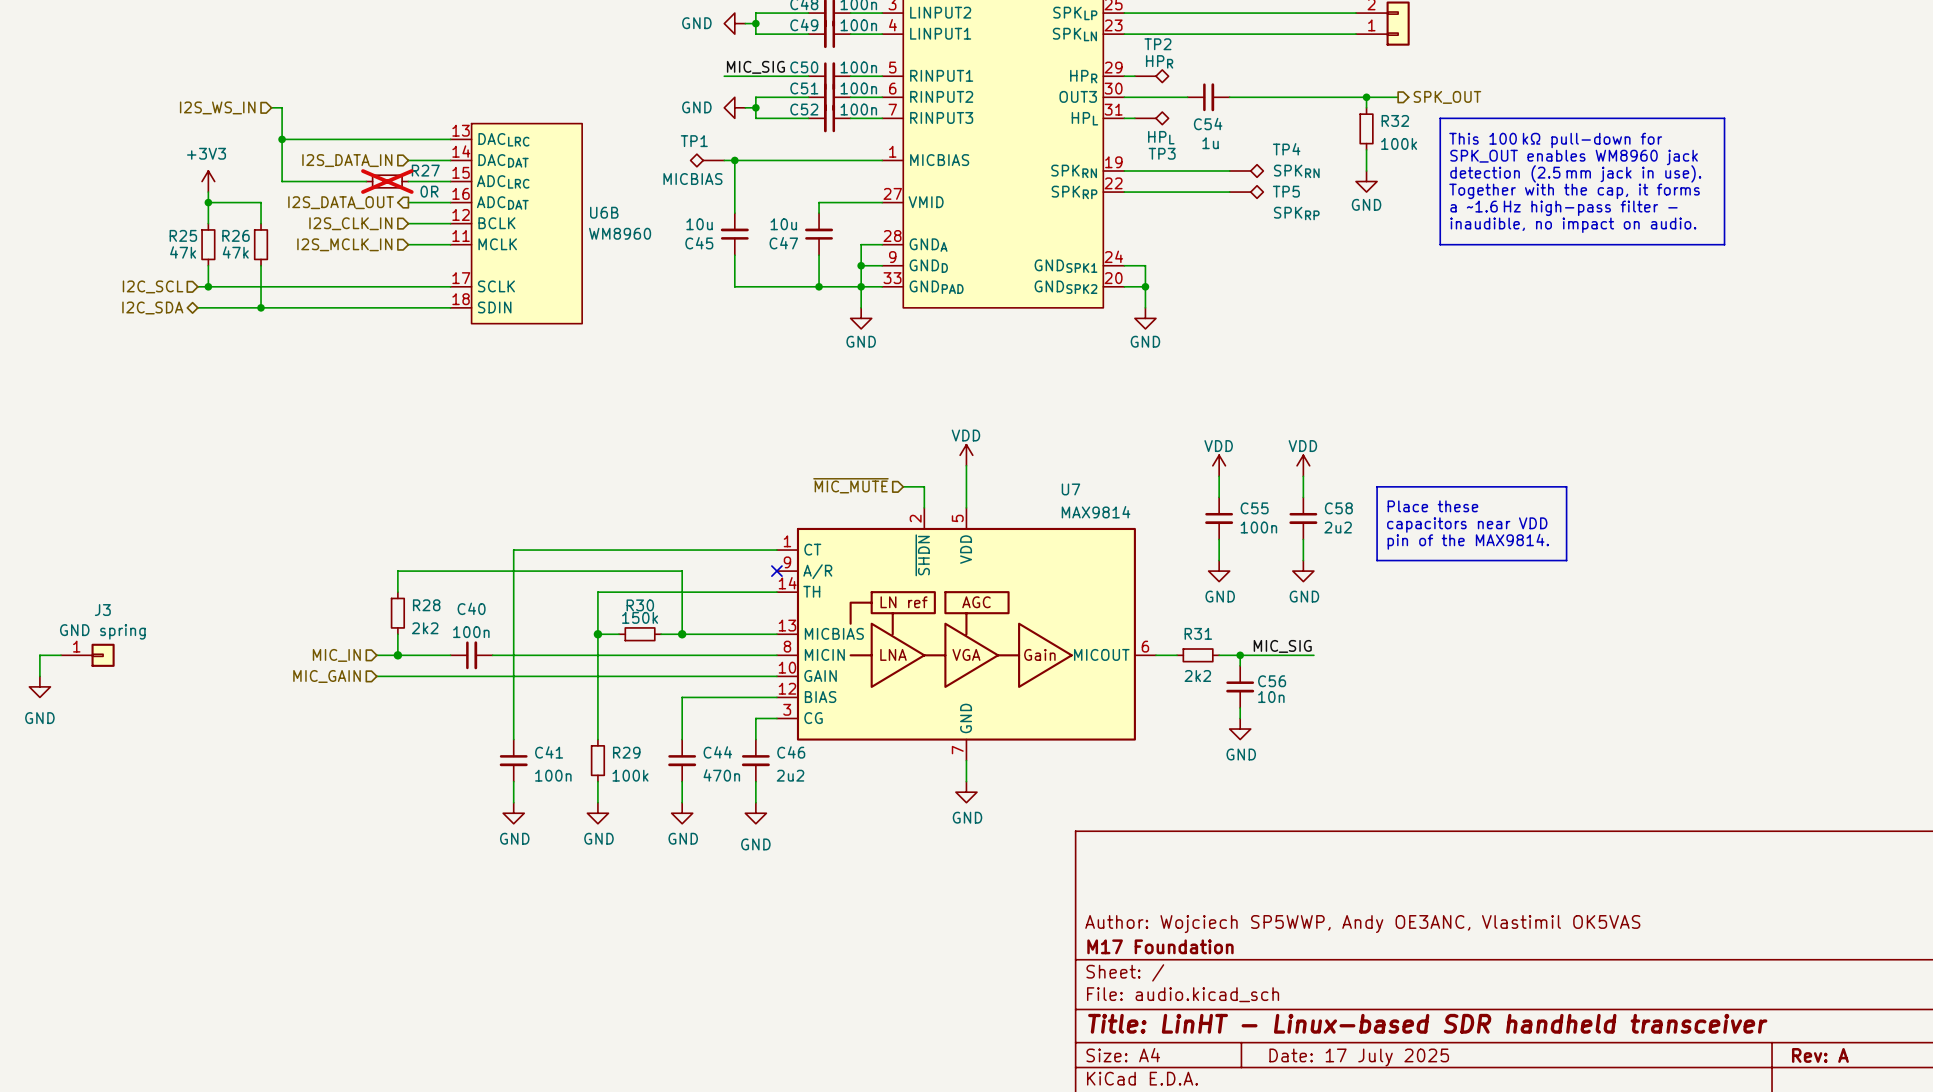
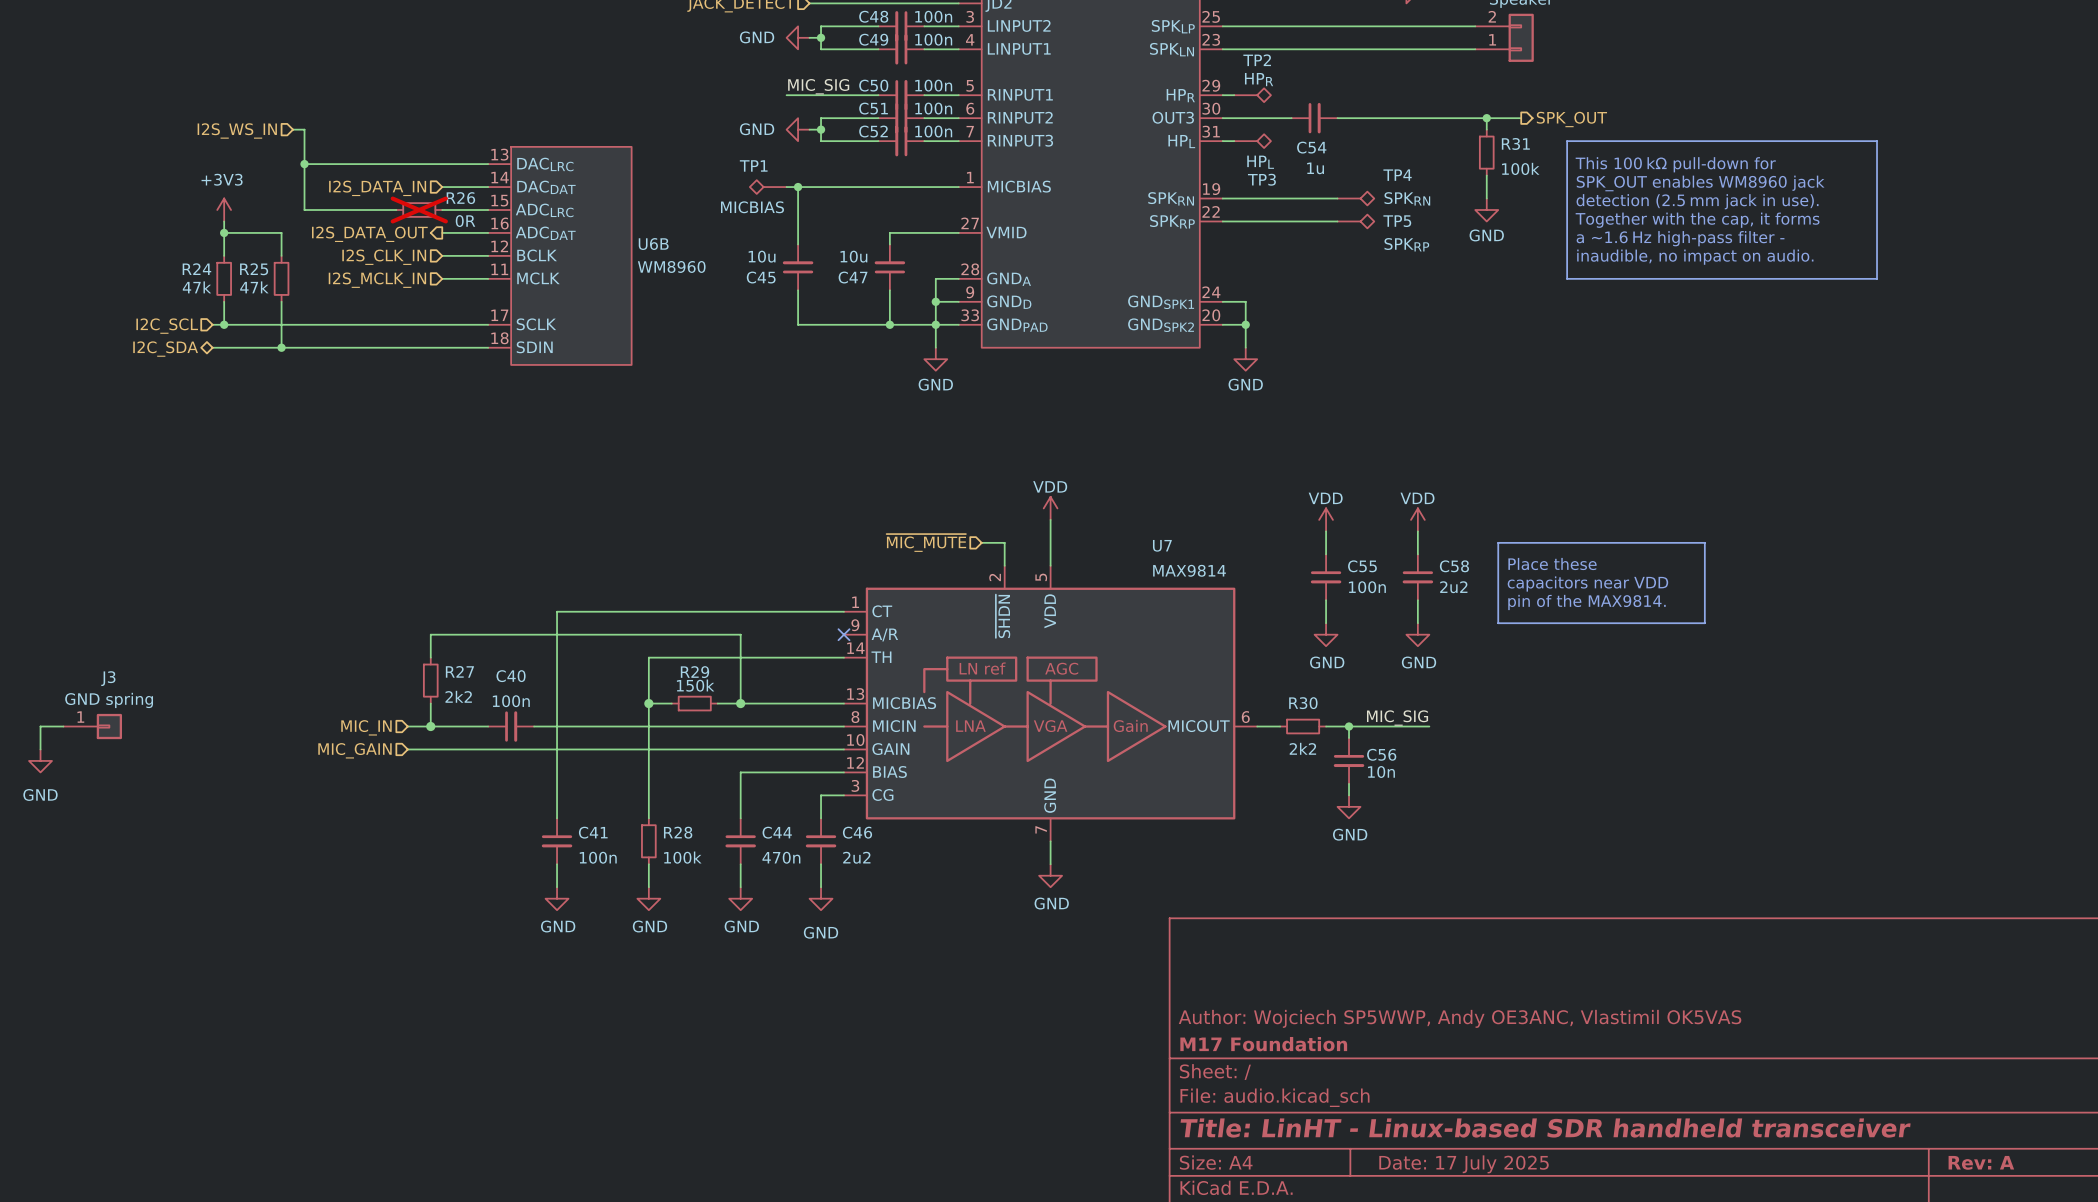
R32 name: R32 (1395, 120) -> R31 (1515, 143)
R27 name: R27 (425, 170) -> R26 (460, 198)
R25 name: R25 (183, 235) -> R24 (196, 269)
R26 name: R26 (236, 235) -> R25 (254, 269)
R28 name: R28 (426, 605) -> R27 (459, 671)
R30 name: R30 (640, 605) -> R29 (694, 672)
R31 name: R31 (1198, 633) -> R30 (1303, 703)
R29 name: R29 (626, 752) -> R28 (678, 832)

